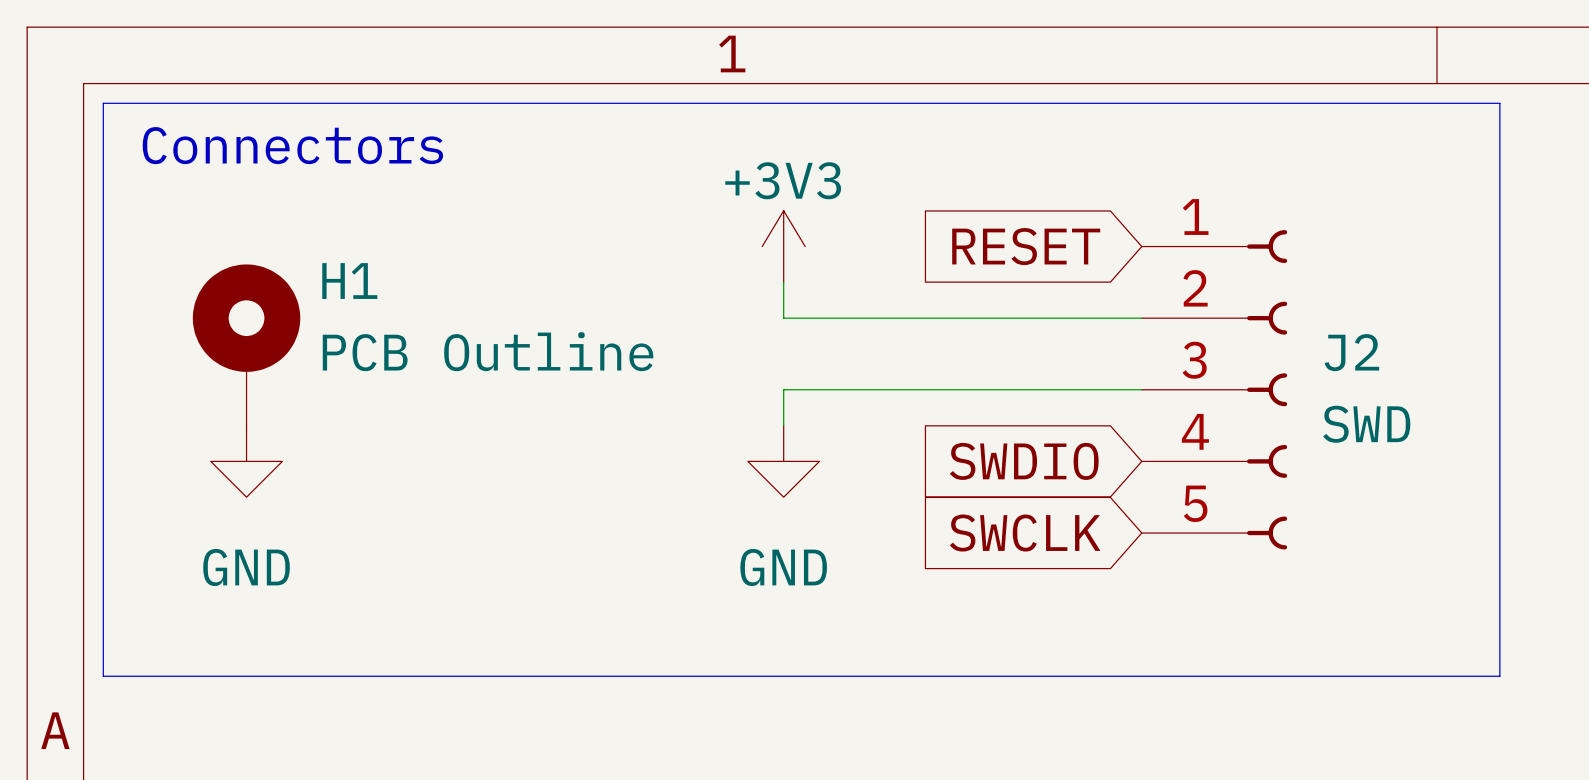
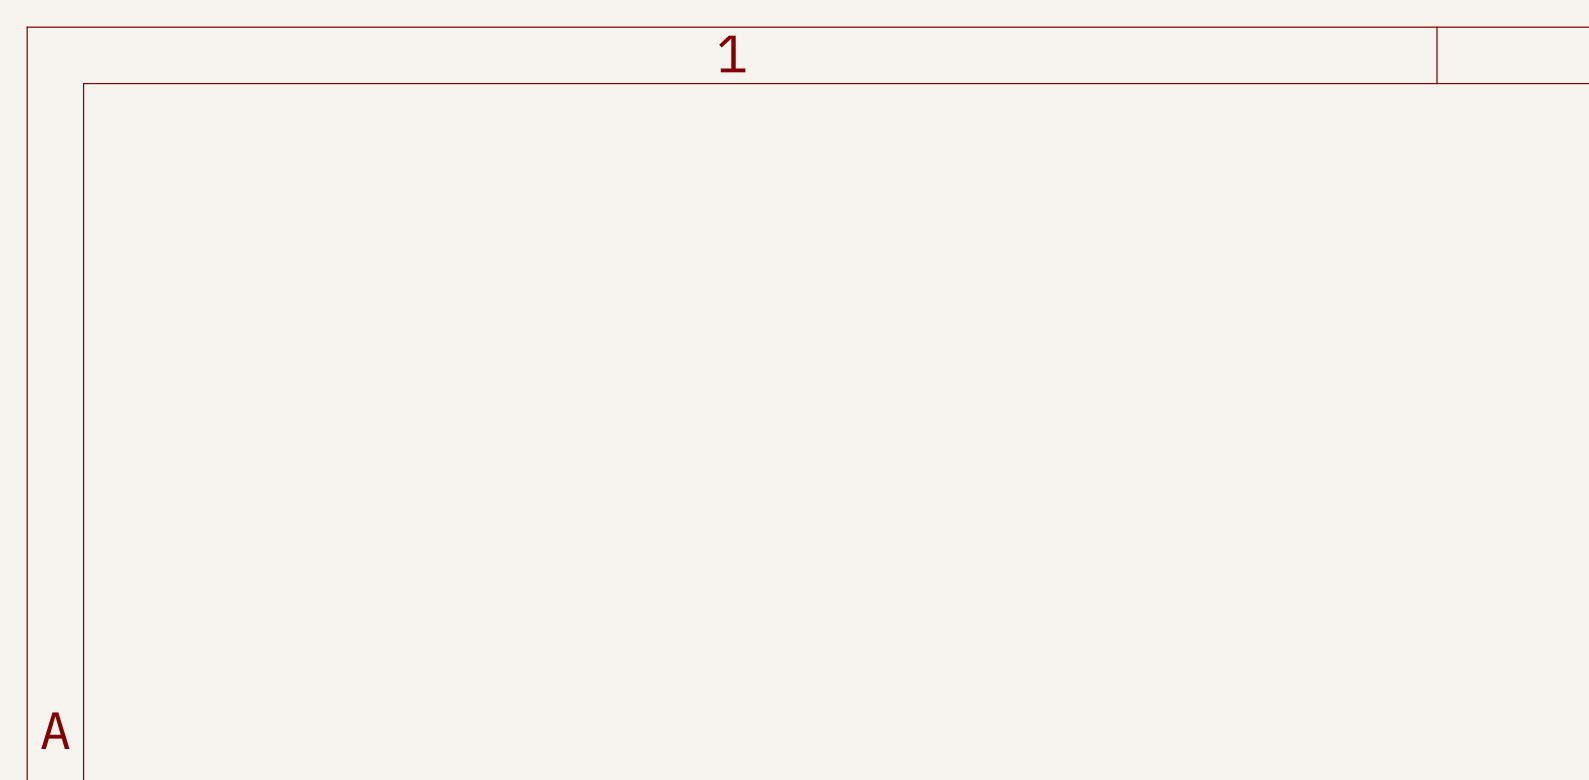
line: (103, 103) (103, 676) (1499, 676) (1499, 103) (103, 103) -> none
text: Connectors (292, 145) -> none
power symbol: +3V3 (783, 246) -> none
global label: RESET (1026, 246) -> none
wire: (783, 282) (783, 318) (1141, 318) -> none
H1: PCB Outline (246, 345) -> none
wire: (1141, 389) (783, 389) (783, 425) -> none
J2: SWD (1214, 389) -> none
power symbol: GND (246, 461) -> none
power symbol: GND (783, 461) -> none
global label: SWDIO (1024, 461) -> none
global label: SWCLK (1025, 533) -> none

